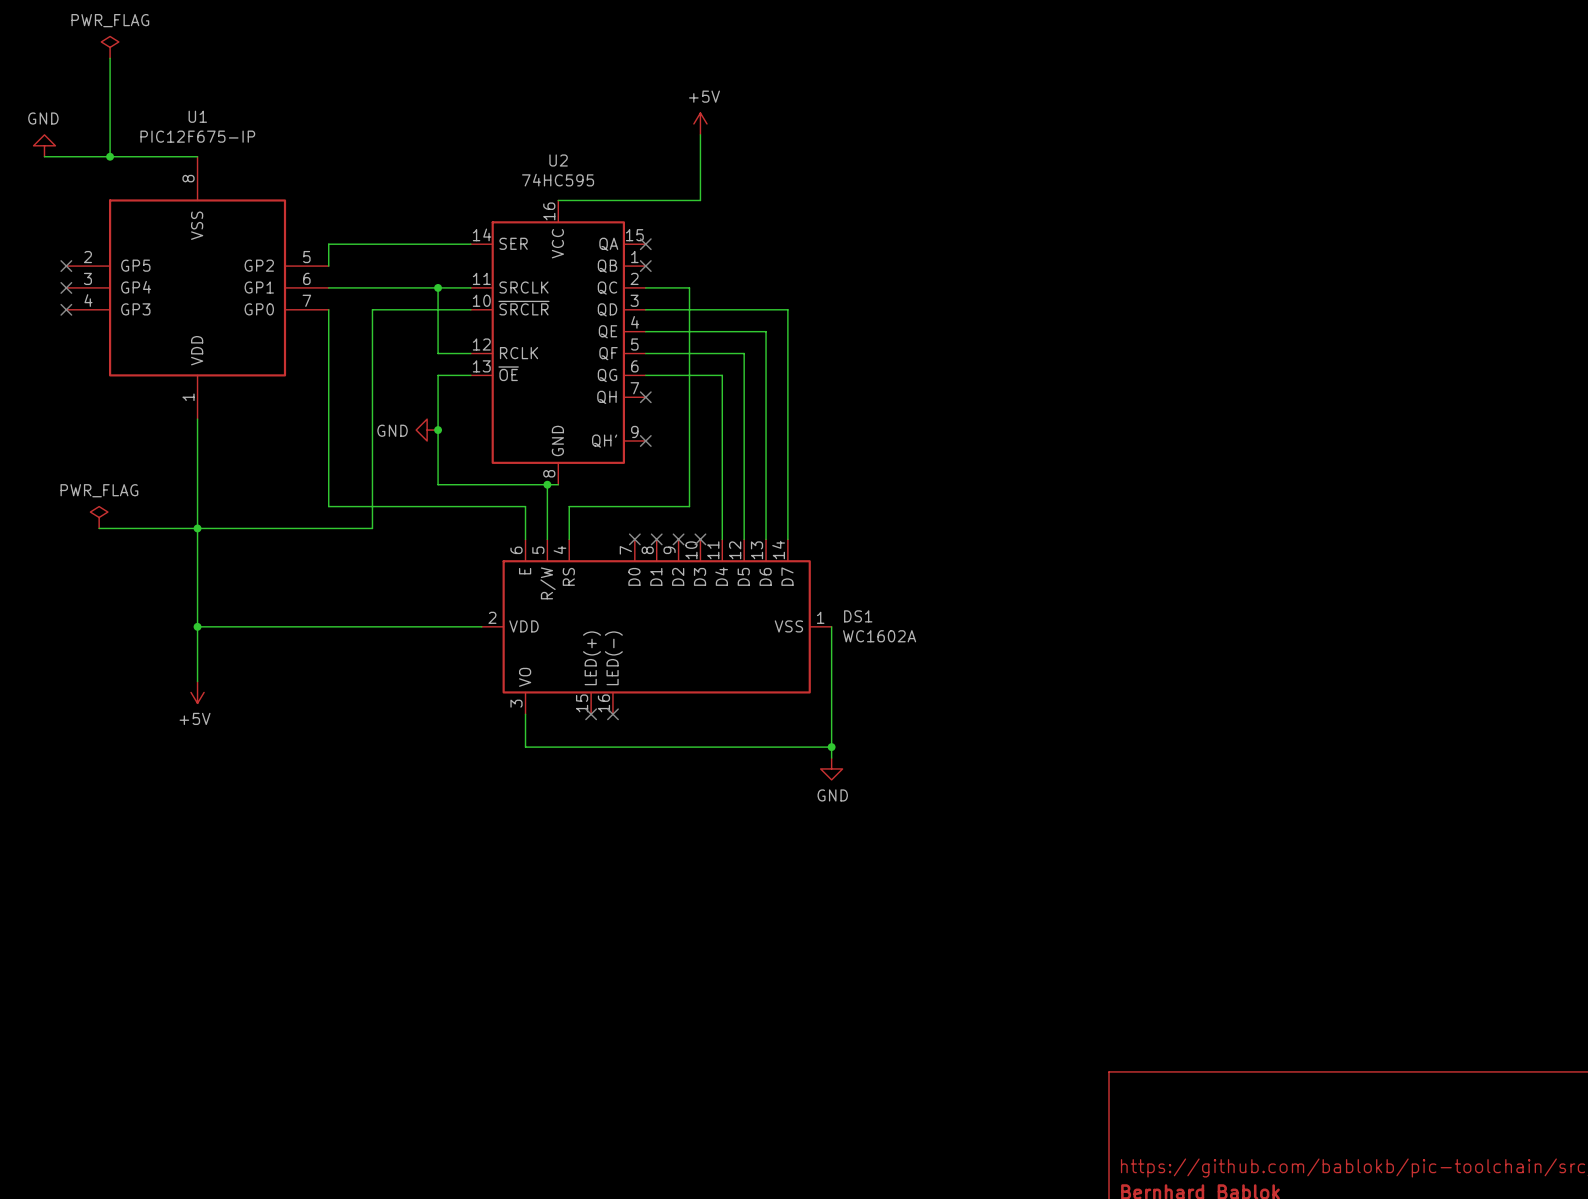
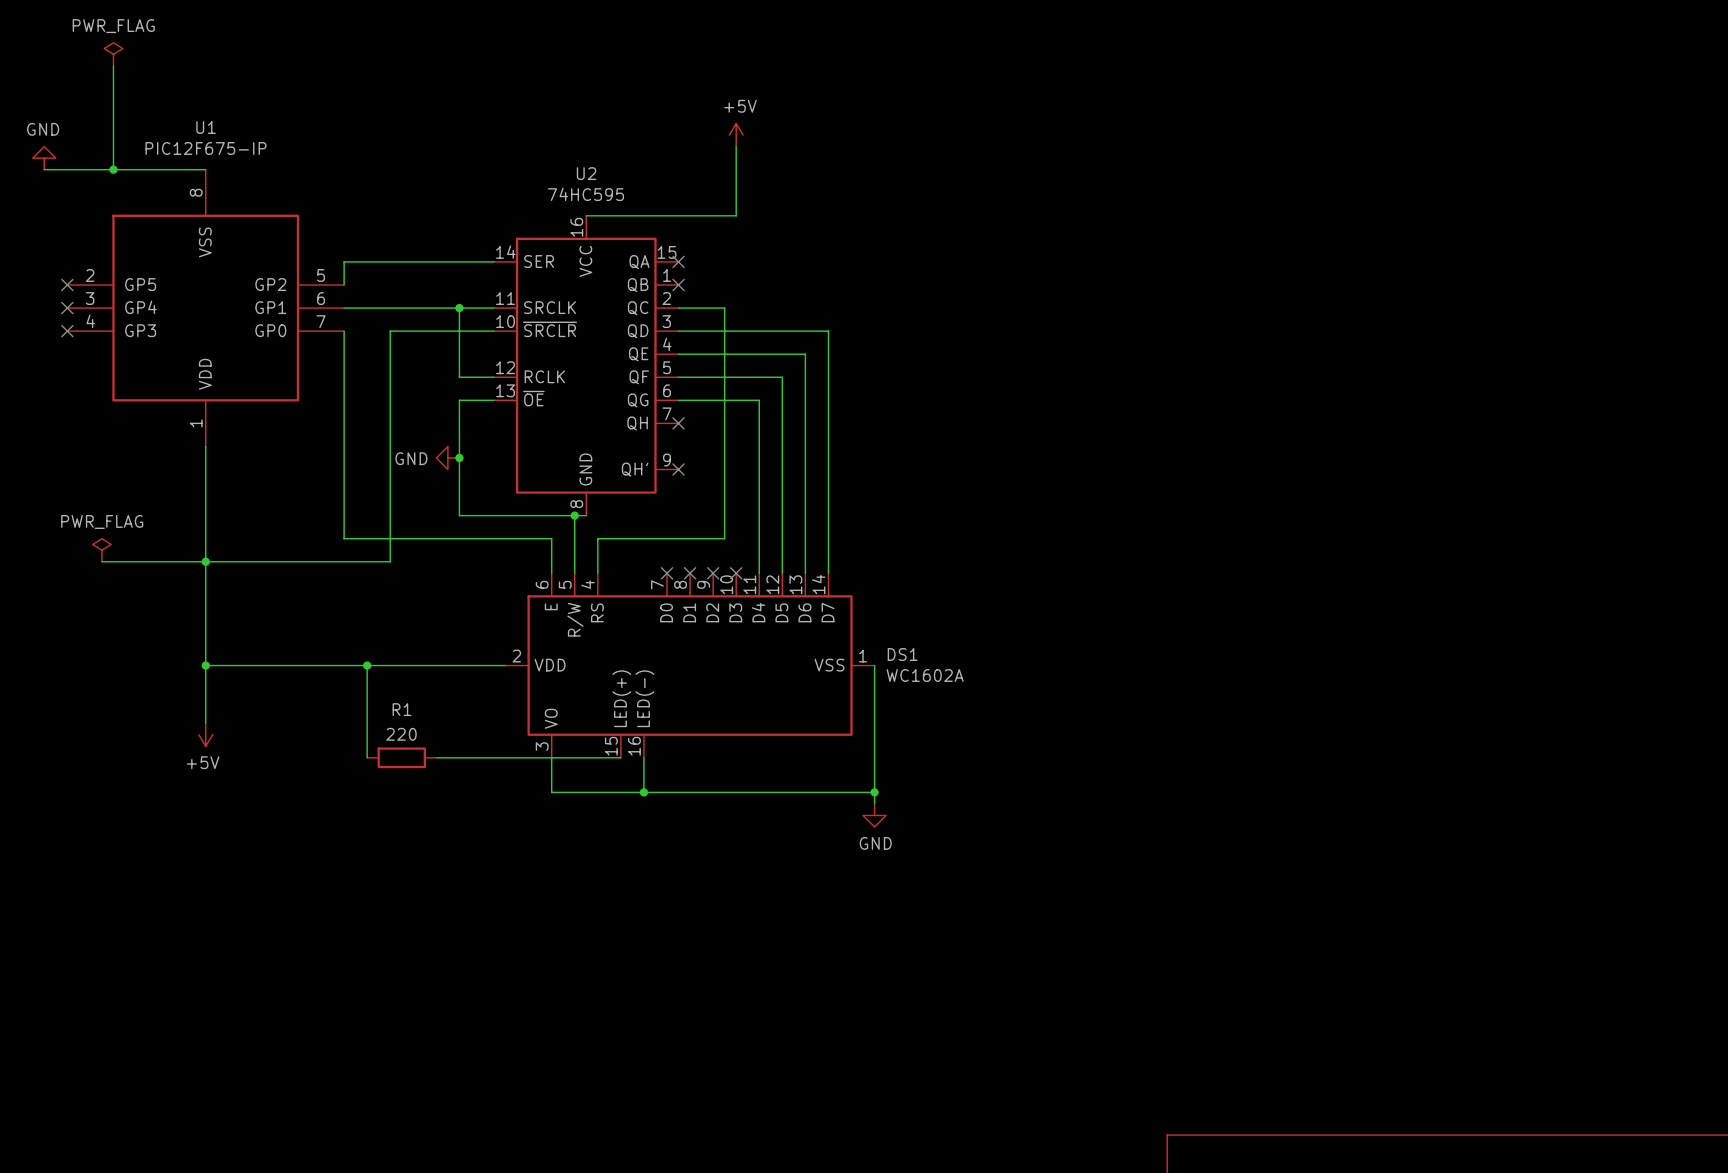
wire: none -> (367, 665) (367, 757)
junction: none -> (367, 665)
R1: none -> 220 (401, 757)
wire: none -> (436, 757) (620, 757)
no-connect mark: (591, 714) -> none
wire: none -> (643, 757) (643, 792)
no-connect mark: (612, 714) -> none
junction: none -> (643, 792)

